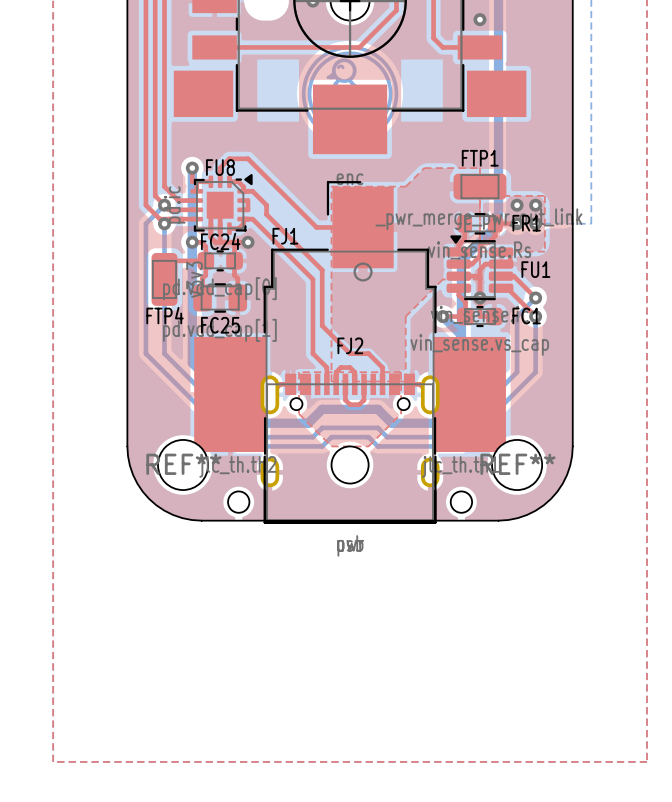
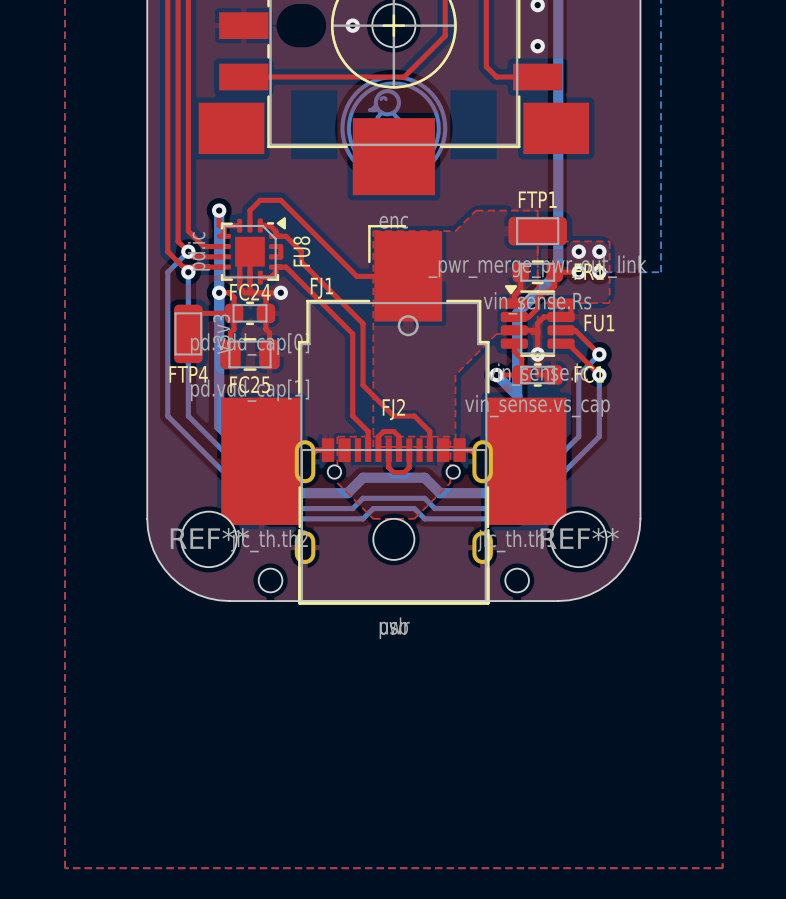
FU8 name rotation: 0° (220, 167) -> 90° counterclockwise (301, 251)
FU8 name position: FU8 (220, 167) -> FU8 (301, 251)

